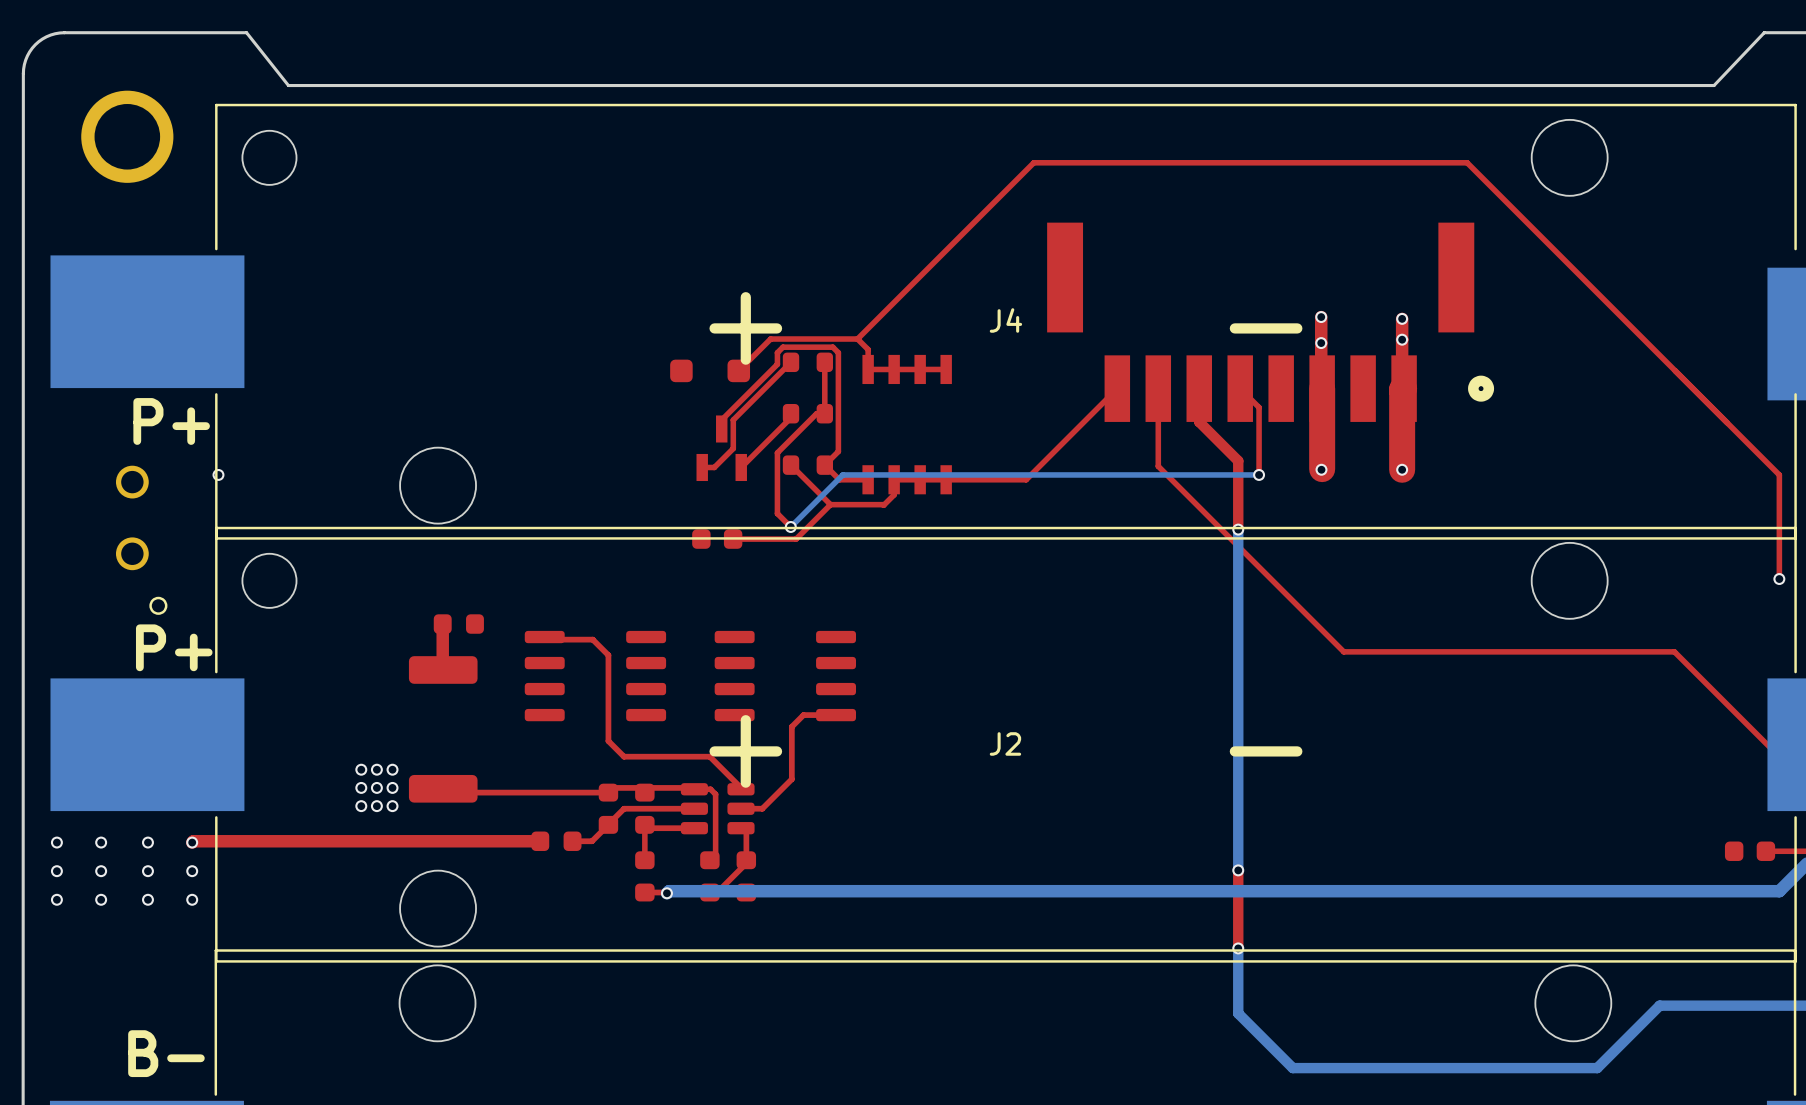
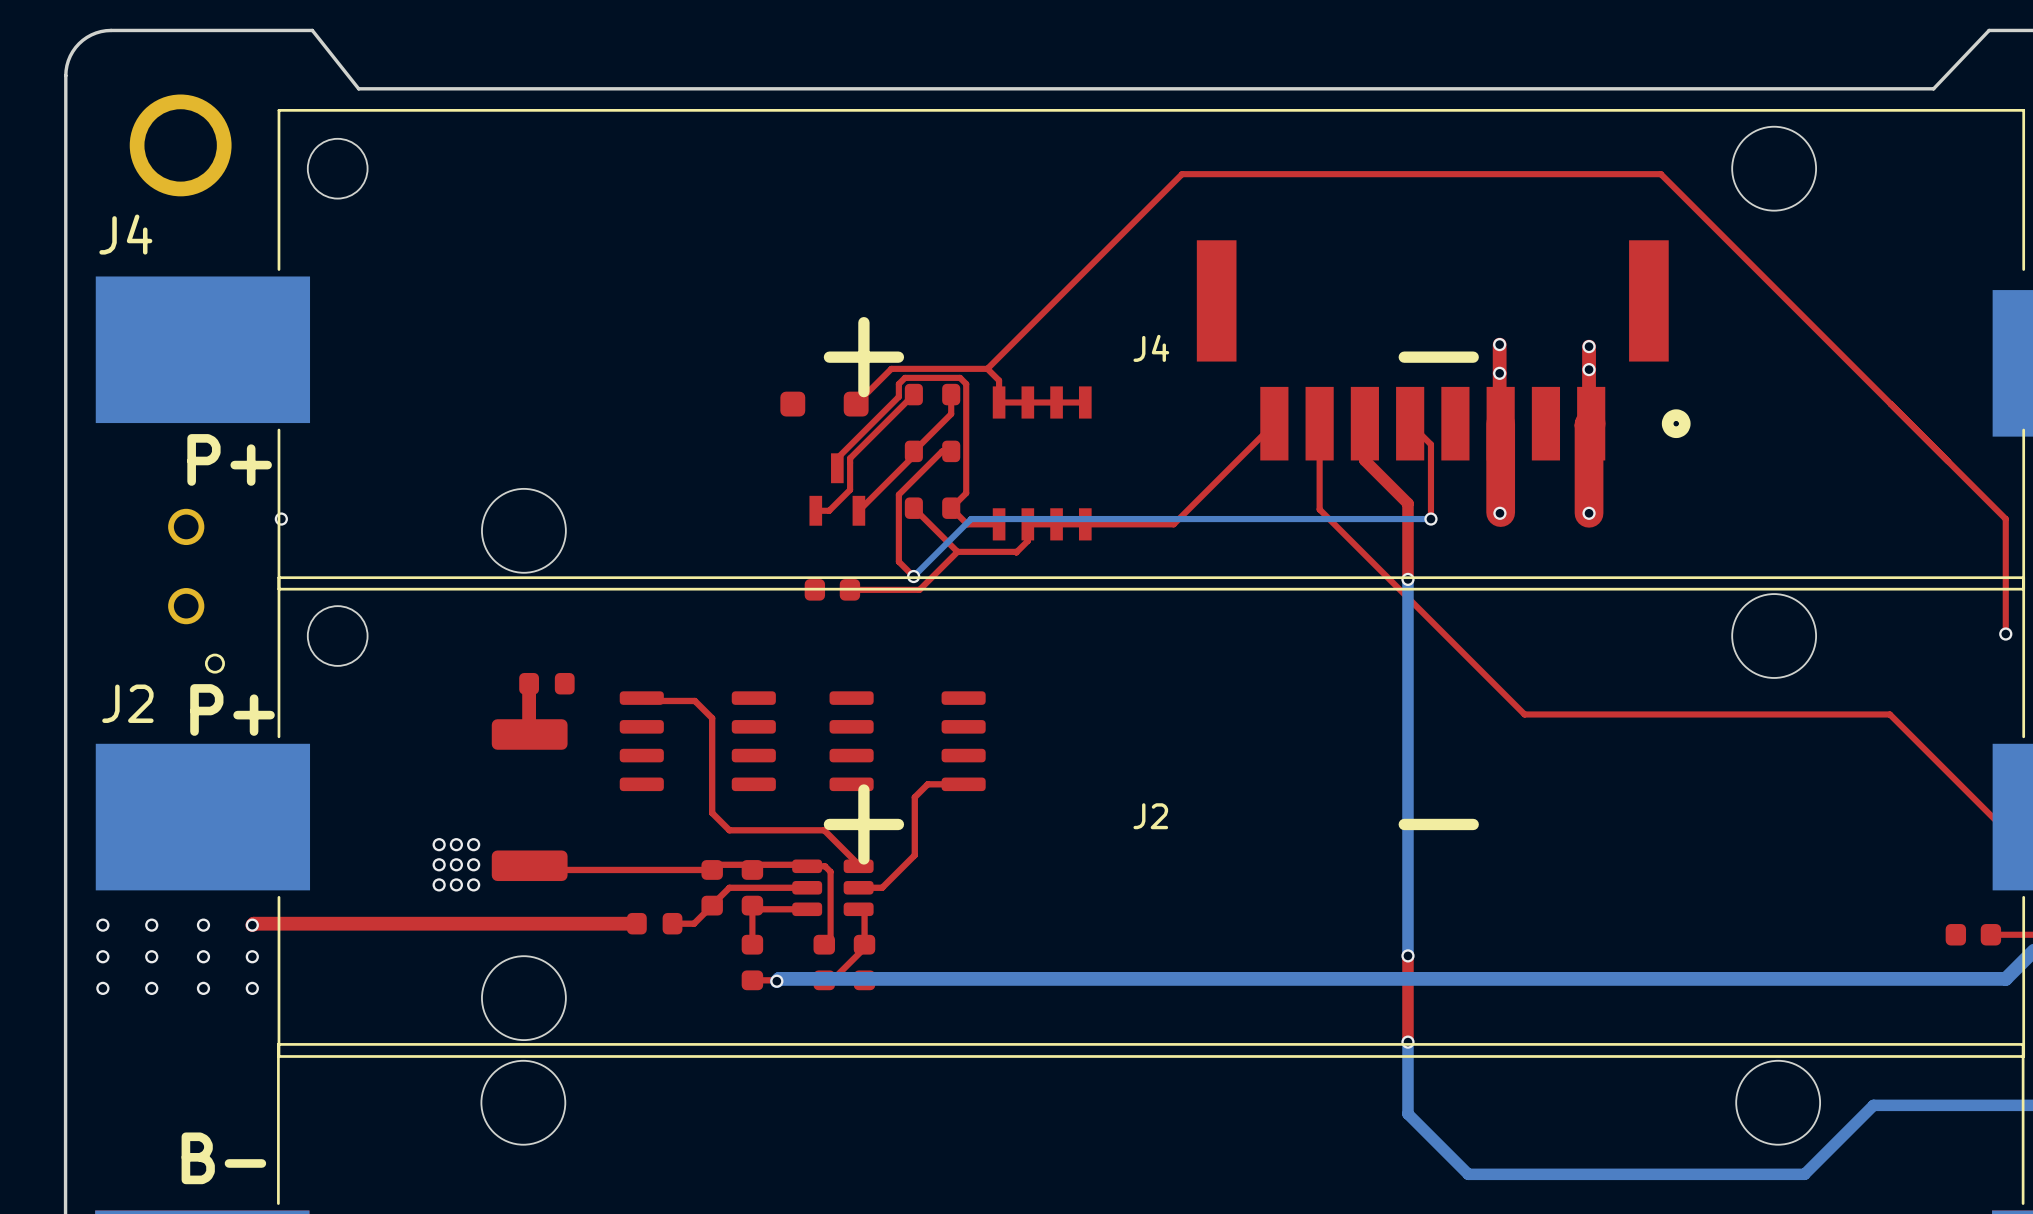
text: none -> J4 (125, 234)
top track: (824, 379) (824, 413) -> (951, 414) (913, 451)
text: none -> J2 (127, 703)

